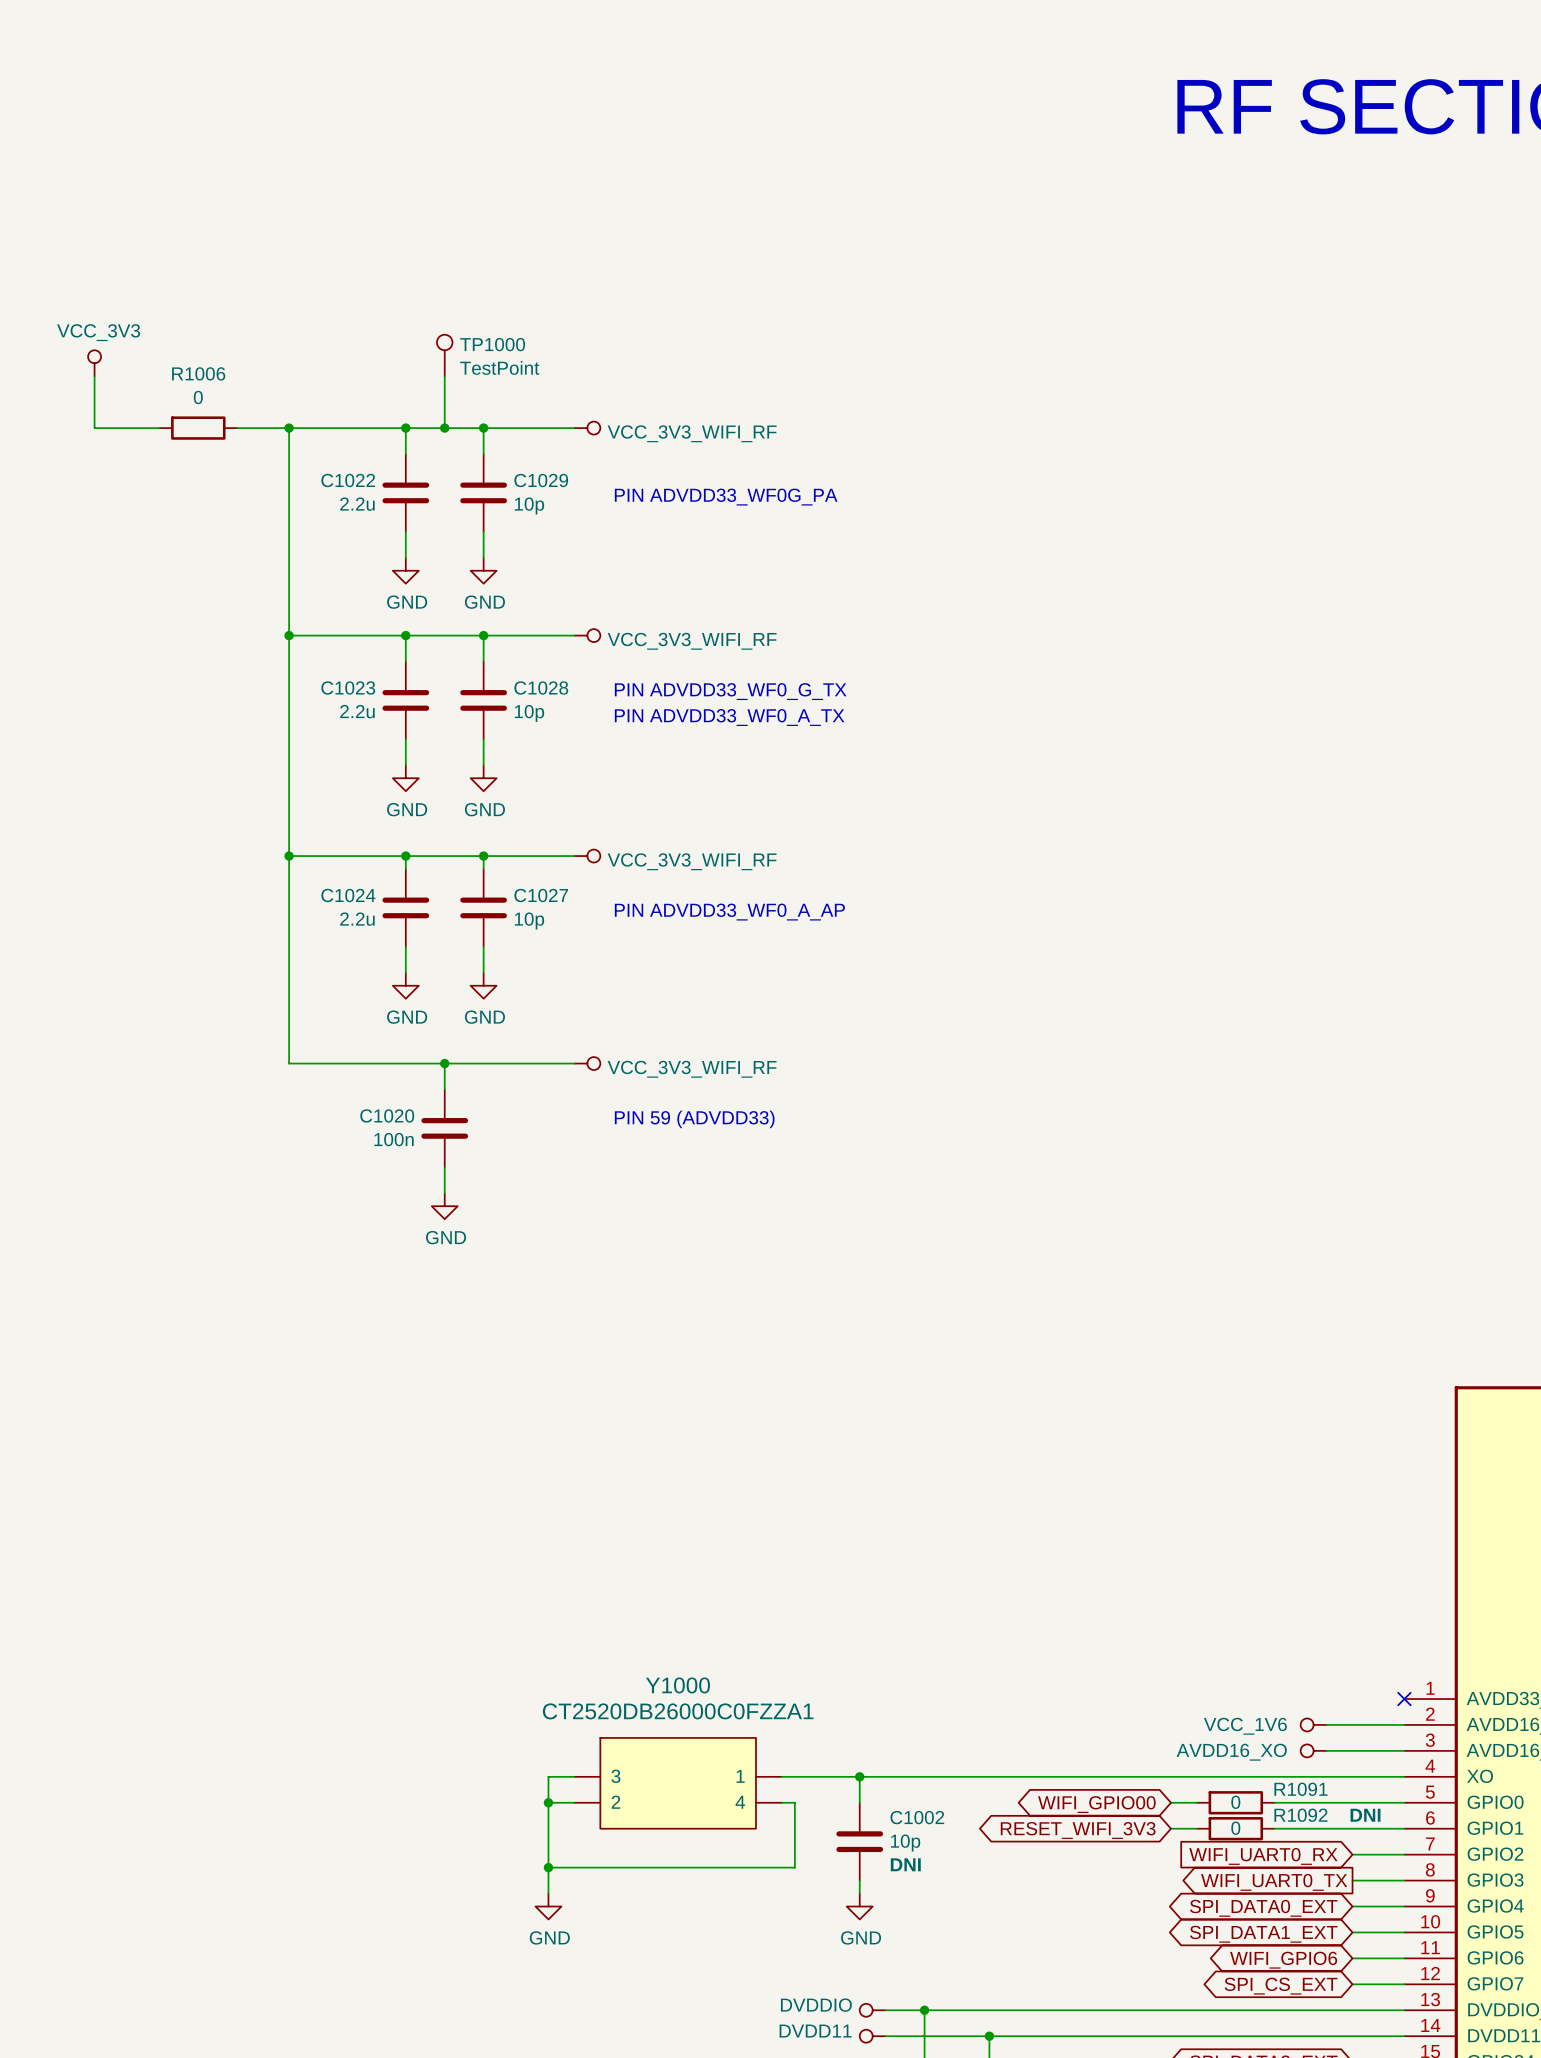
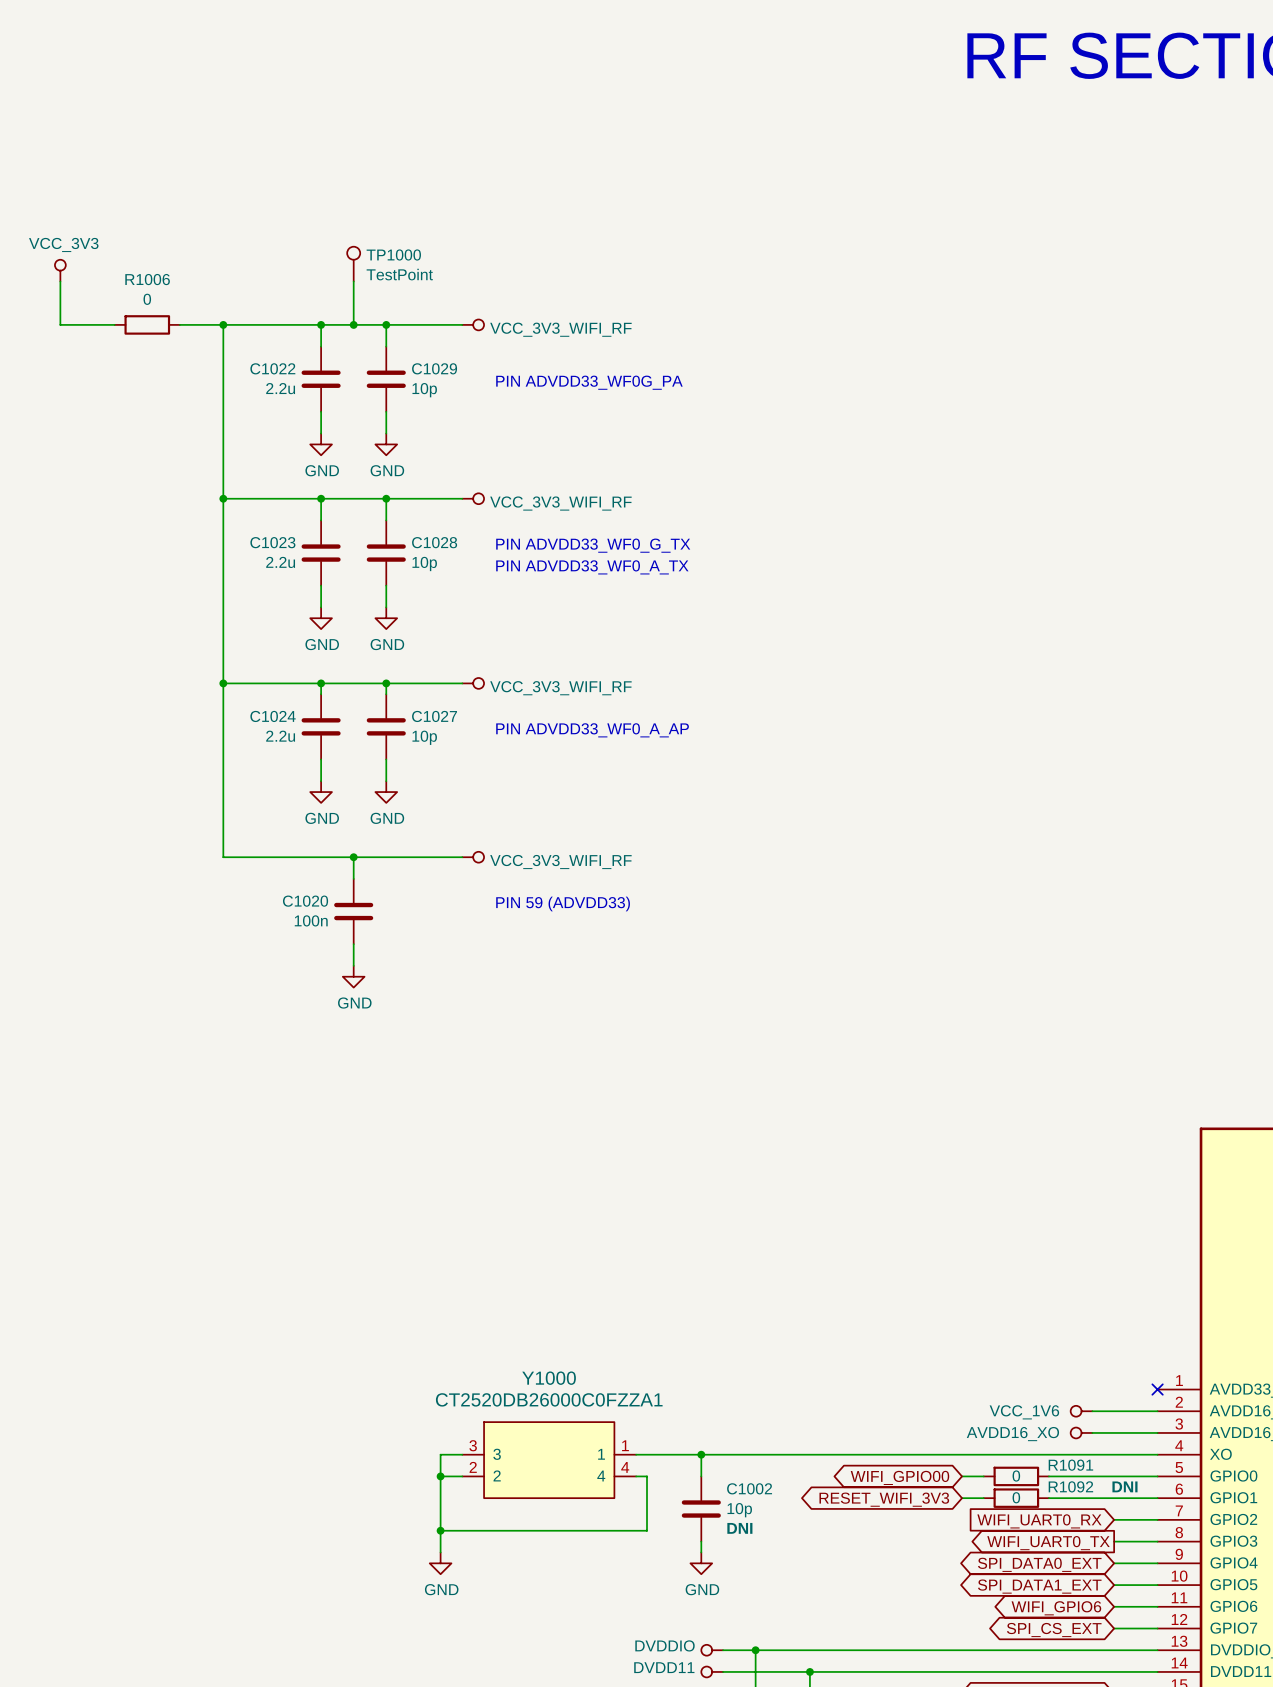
Y1000 pin number: none -> 3 (473, 1445)
Y1000 pin number: none -> 1 (625, 1445)
Y1000 pin number: none -> 2 (473, 1467)
Y1000 pin number: none -> 4 (625, 1467)

